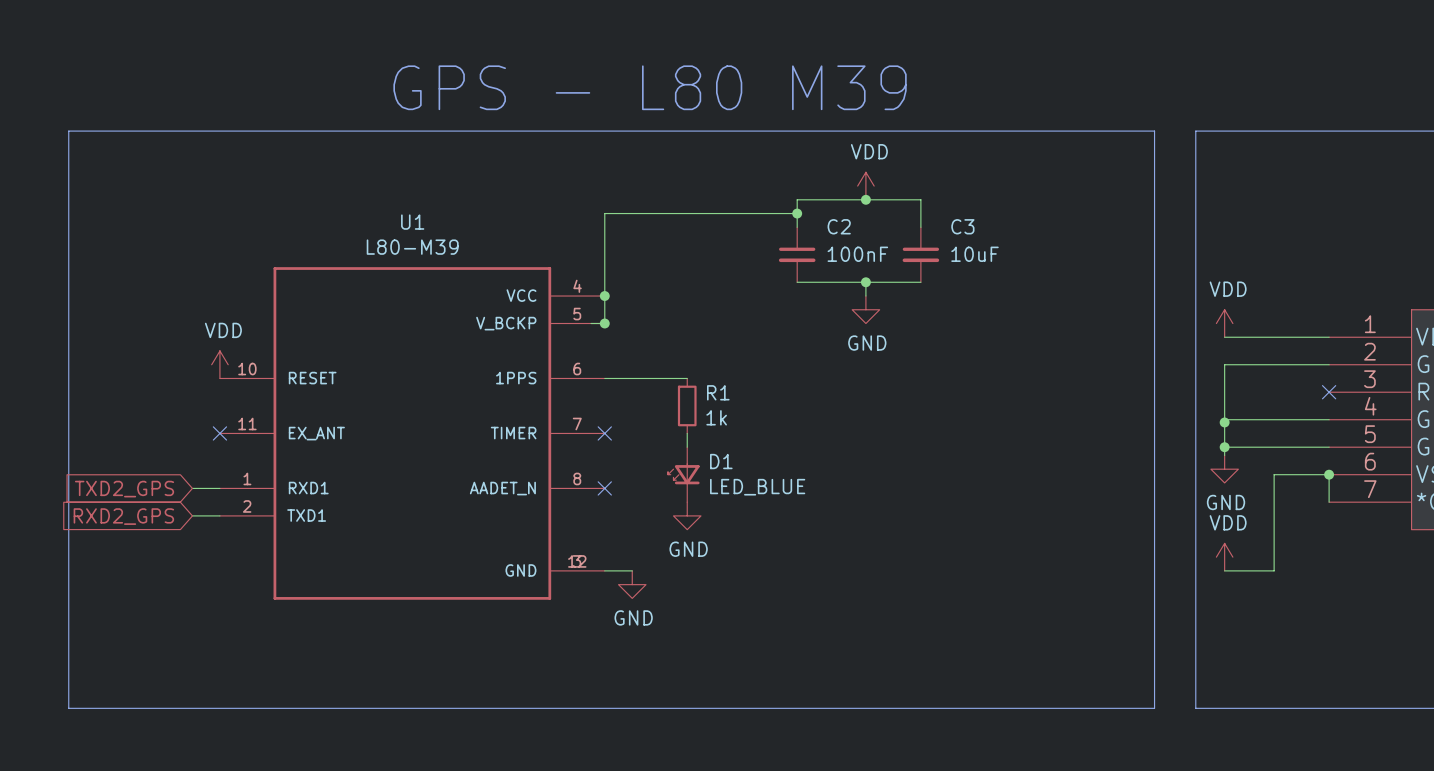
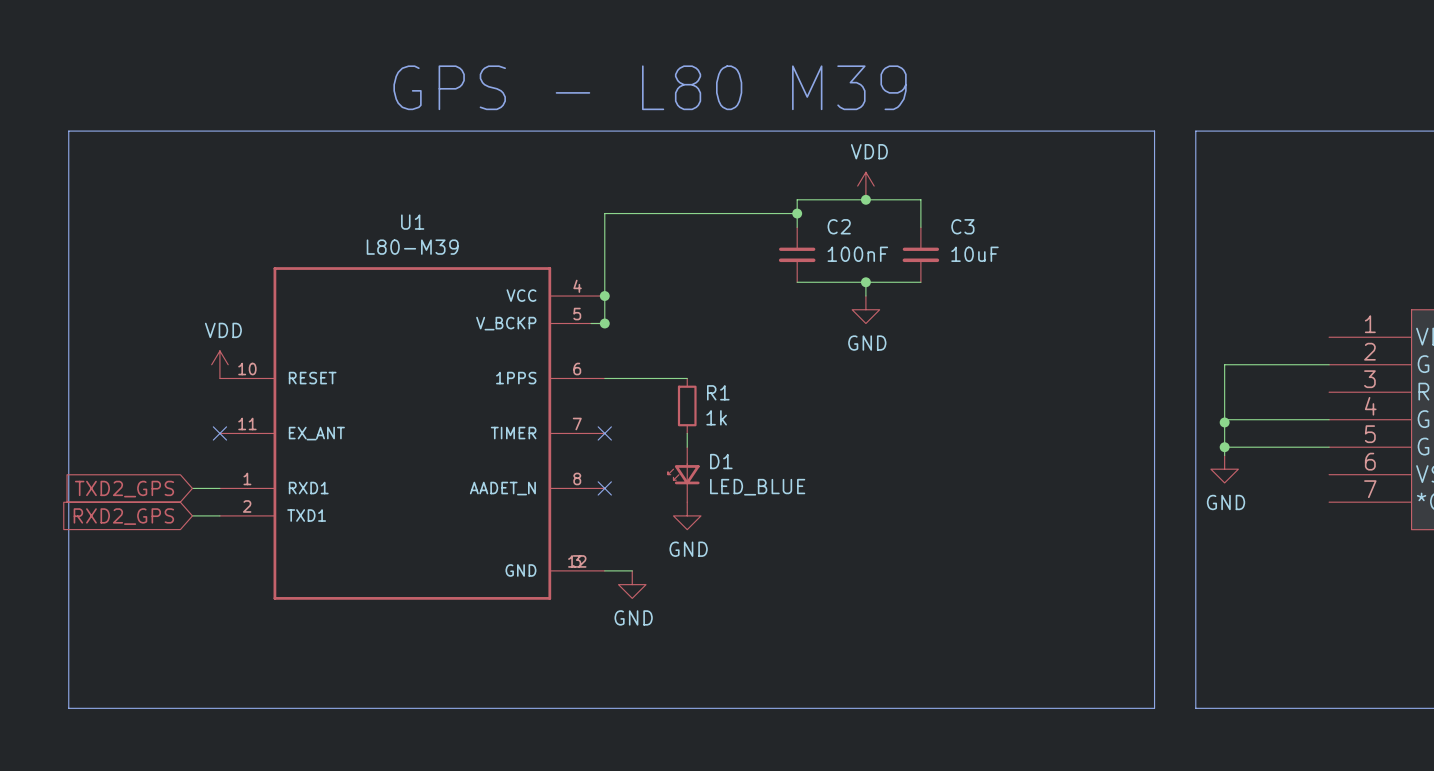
power symbol: VDD (1224, 323) -> none
wire: (1224, 337) (1329, 337) -> none
no-connect mark: (1329, 392) -> none
junction: (1329, 474) -> none
wire: (1329, 502) (1329, 474) (1274, 474) (1274, 570) (1224, 570) -> none
power symbol: VDD (1224, 557) -> none

